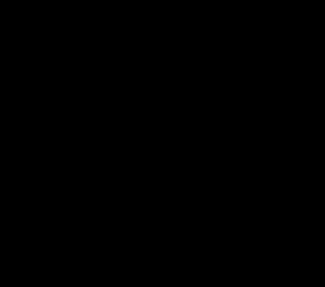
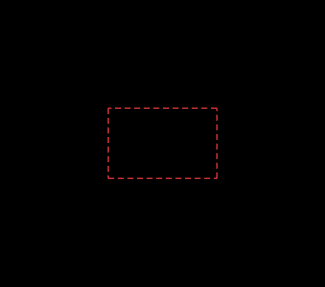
zone outline: none -> (108, 108) (216, 108) (216, 178) (108, 178) (108, 108)

